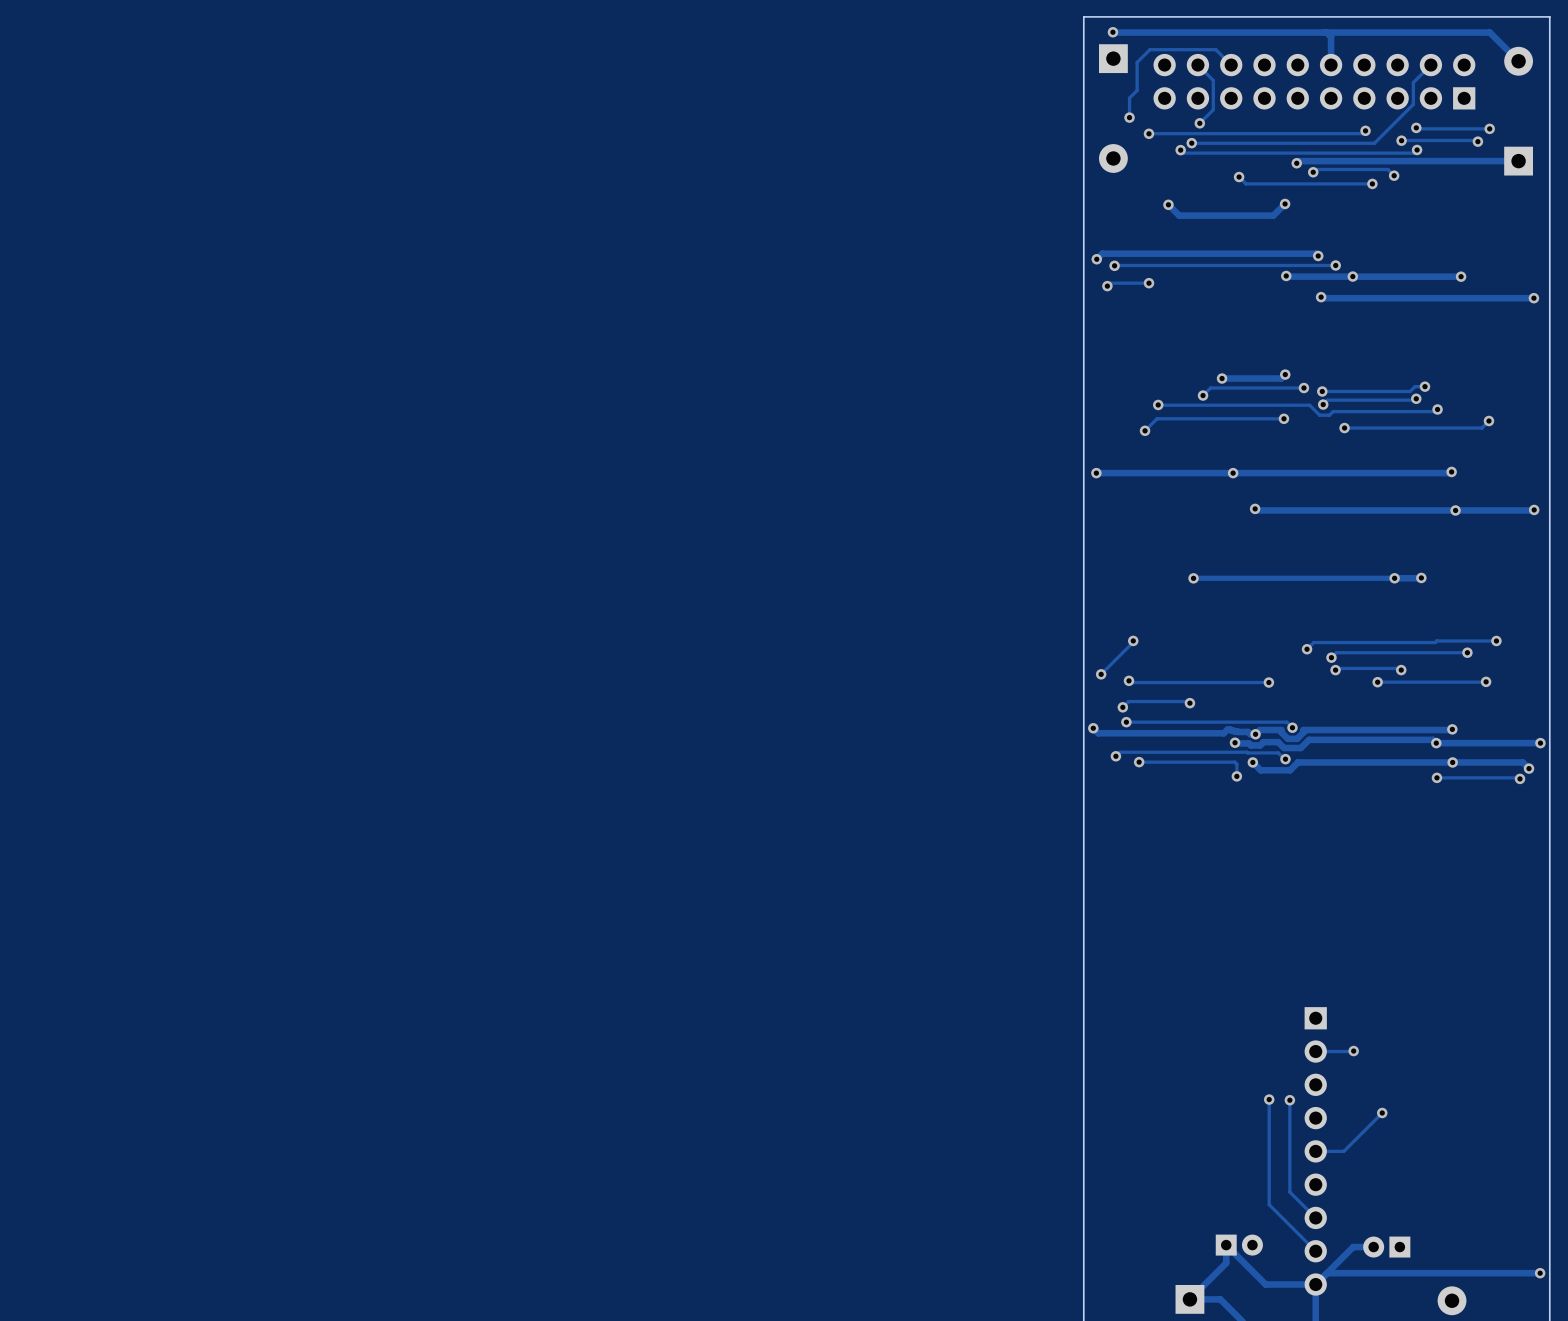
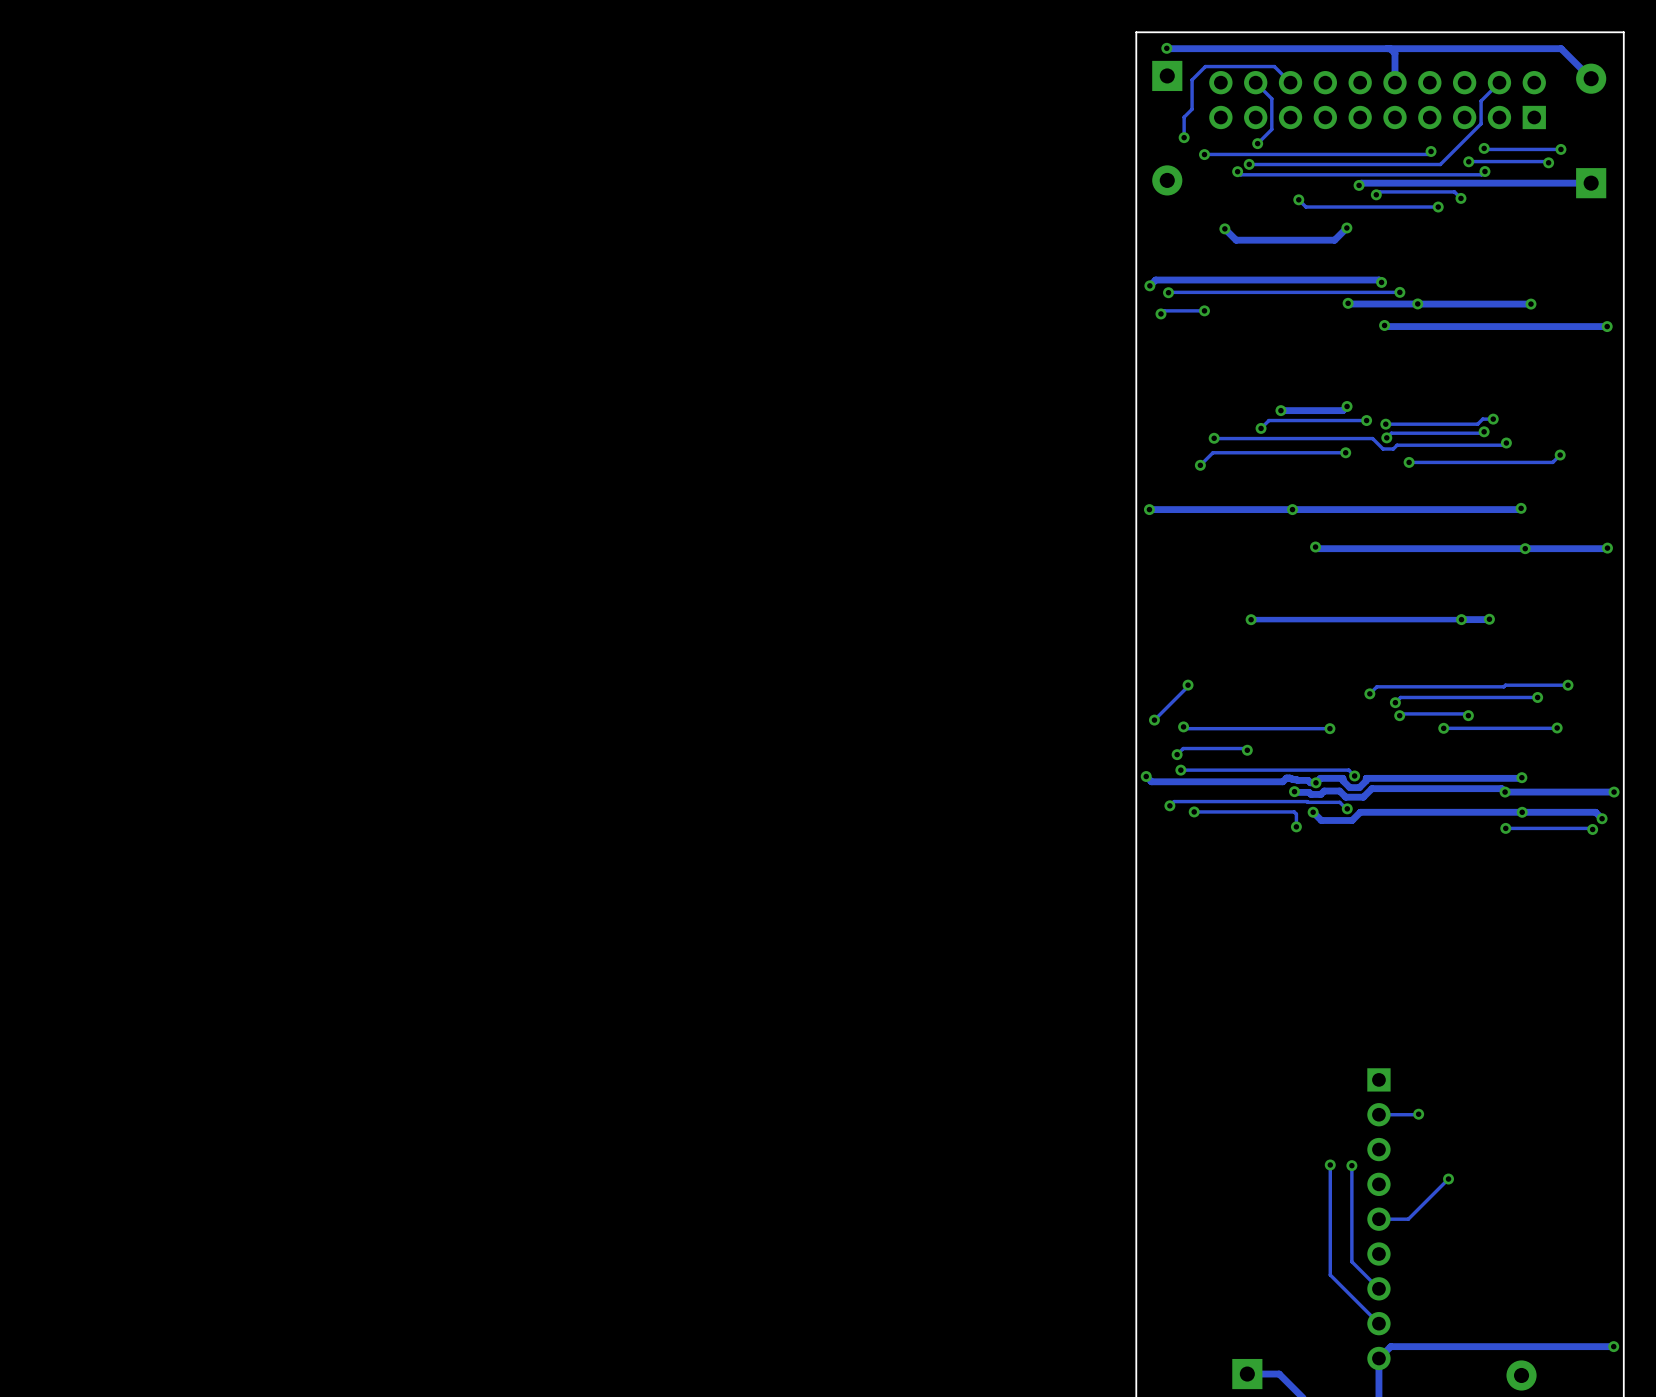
part: (1239, 1245) -> none
track: (1373, 1247) (1353, 1247) (1327, 1273) -> none
part: (1386, 1247) -> none
track: (1315, 1284) (1265, 1284) (1226, 1245) (1226, 1263) (1189, 1299) -> none

